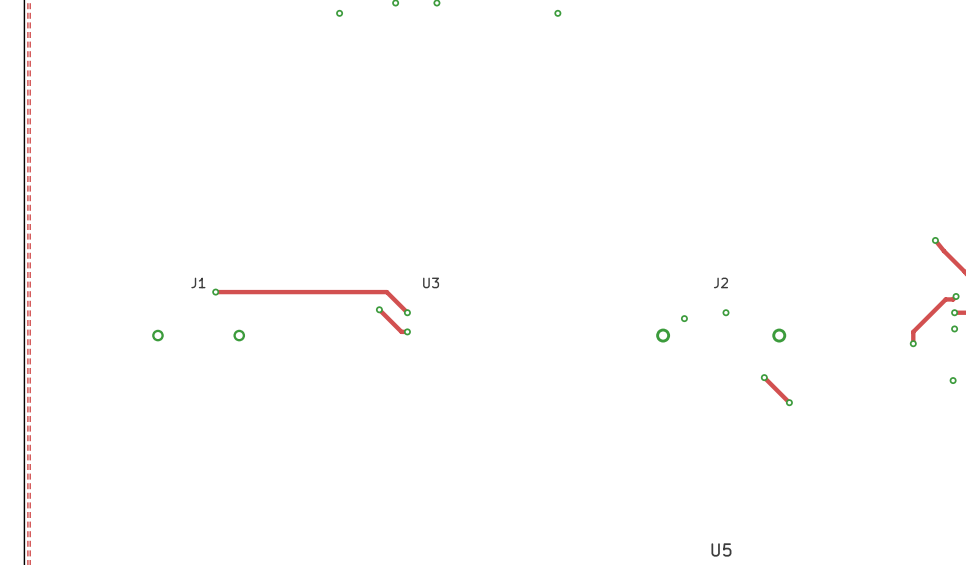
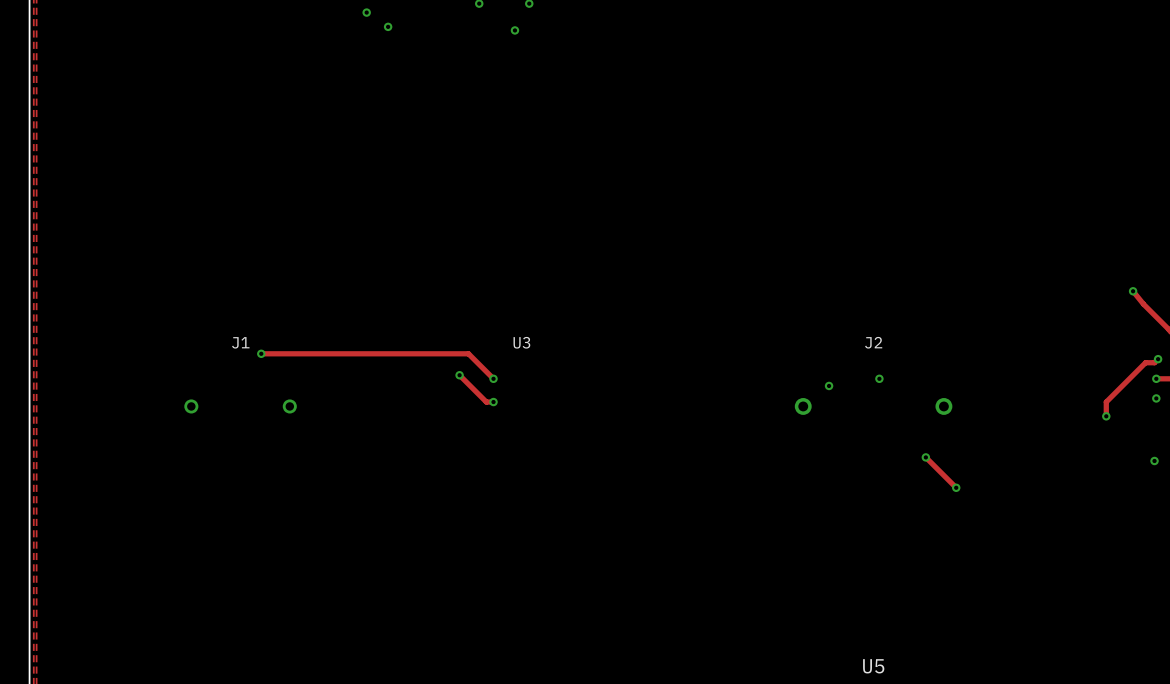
via: none -> (366, 12)
via: (339, 13) -> none
via: (557, 13) -> none
via: none -> (388, 26)
via: none -> (514, 30)

